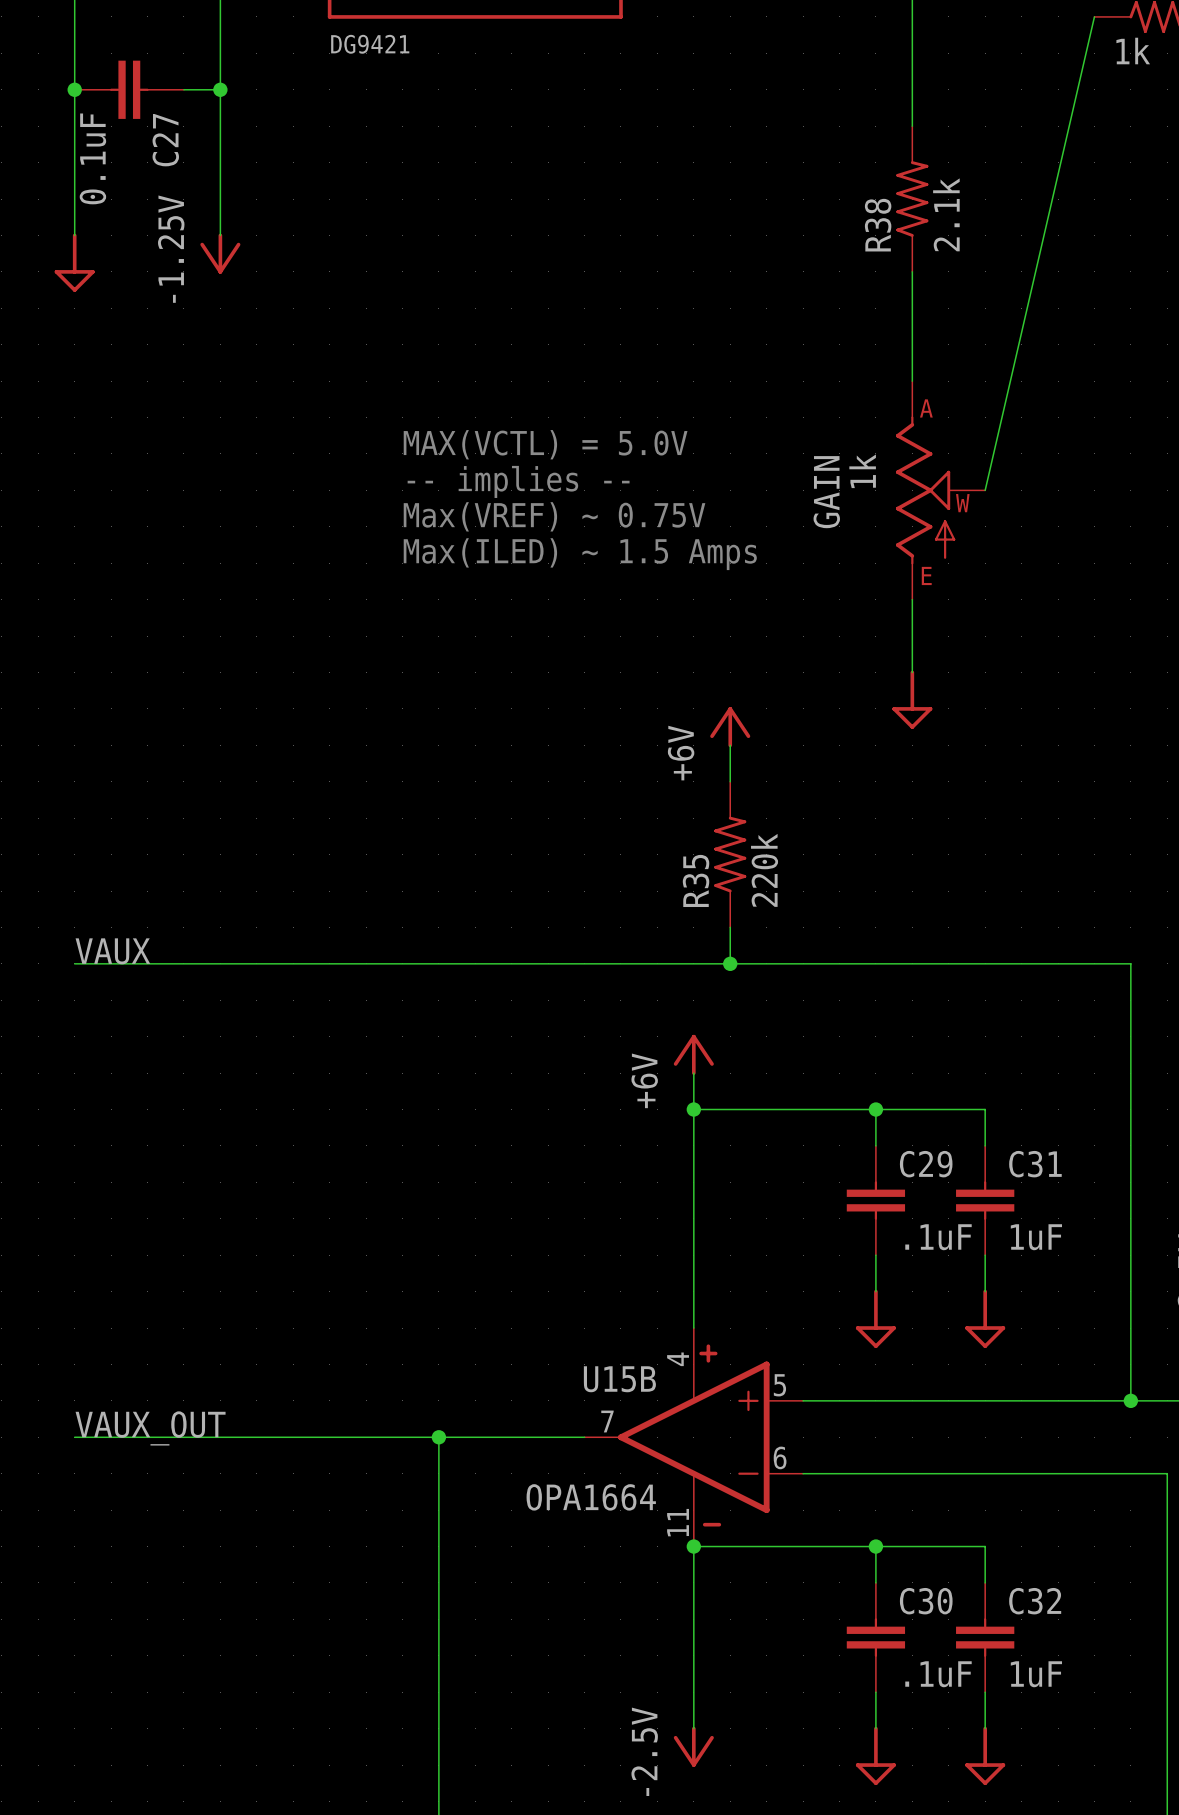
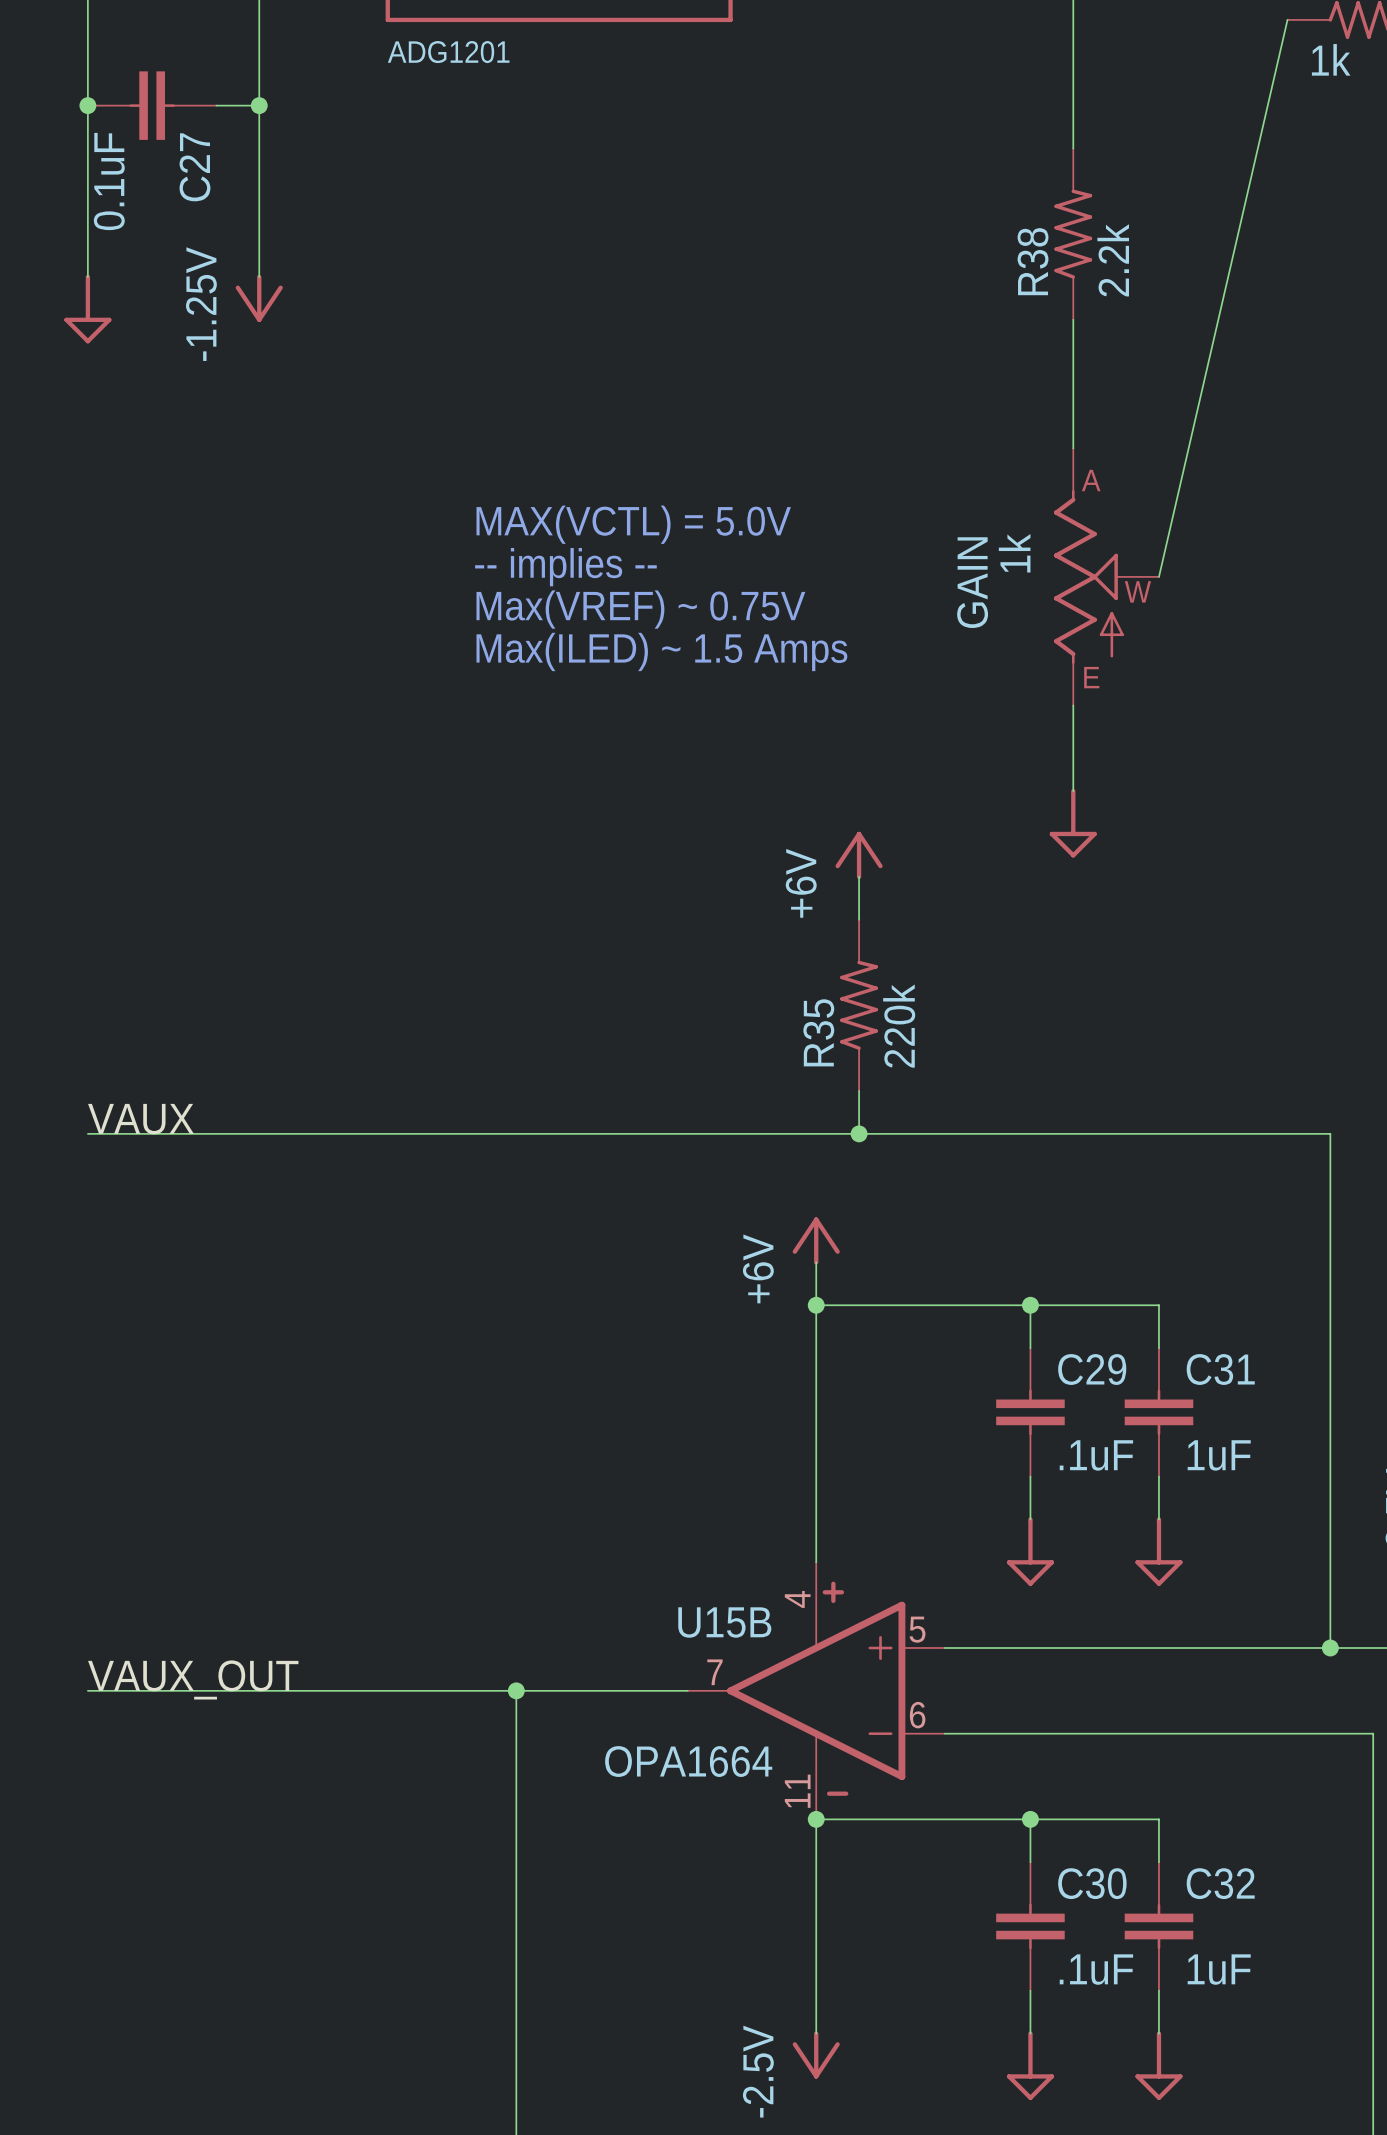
part value: DG9421 (370, 44) -> ADG1201 (448, 52)
R38 value: 2.1k (946, 214) -> 2.2k (1113, 260)

